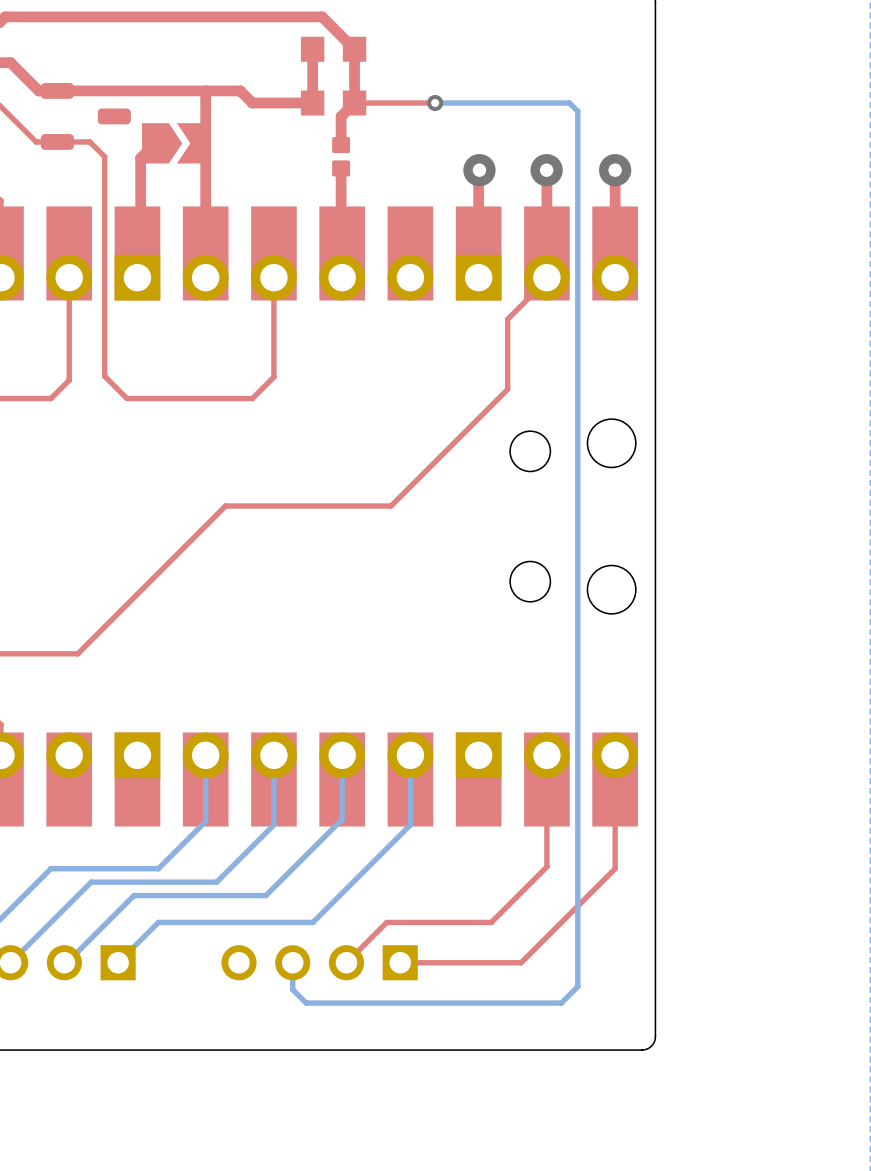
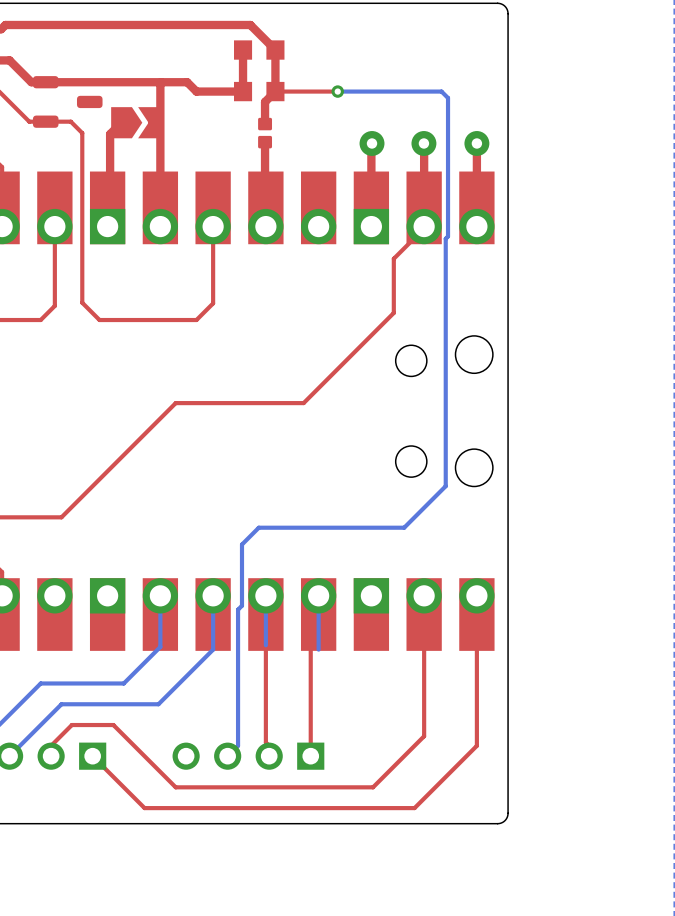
bottom track: (577, 290) (577, 986) (561, 1003) (306, 1003) (292, 989) (292, 962) -> (448, 236) (445, 238) (445, 486) (404, 527) (258, 527) (241, 544) (241, 605) (238, 609) (238, 745) (227, 756)
bottom track: (342, 819) (265, 895) (203, 895) -> none
bottom track: (410, 824) (312, 922) (158, 922) (118, 962) -> none
top track: (546, 866) (491, 922) (386, 922) (346, 962) -> (265, 595) (265, 742) (269, 745) (269, 756)
top track: (615, 868) (546, 936) -> (424, 682) (424, 736)
top track: none -> (476, 683) (476, 745) (414, 808) (144, 808) (92, 756)
bottom track: (216, 882) (91, 882) (77, 895) -> (168, 693) (158, 704)
bottom track: (134, 895) (66, 962) -> (104, 704) (61, 704)
top track: (521, 962) (400, 962) -> (318, 595) (310, 603) (310, 756)
top track: none -> (404, 756) (373, 787) (175, 787) (113, 725) (71, 725) (51, 745) (51, 756)

